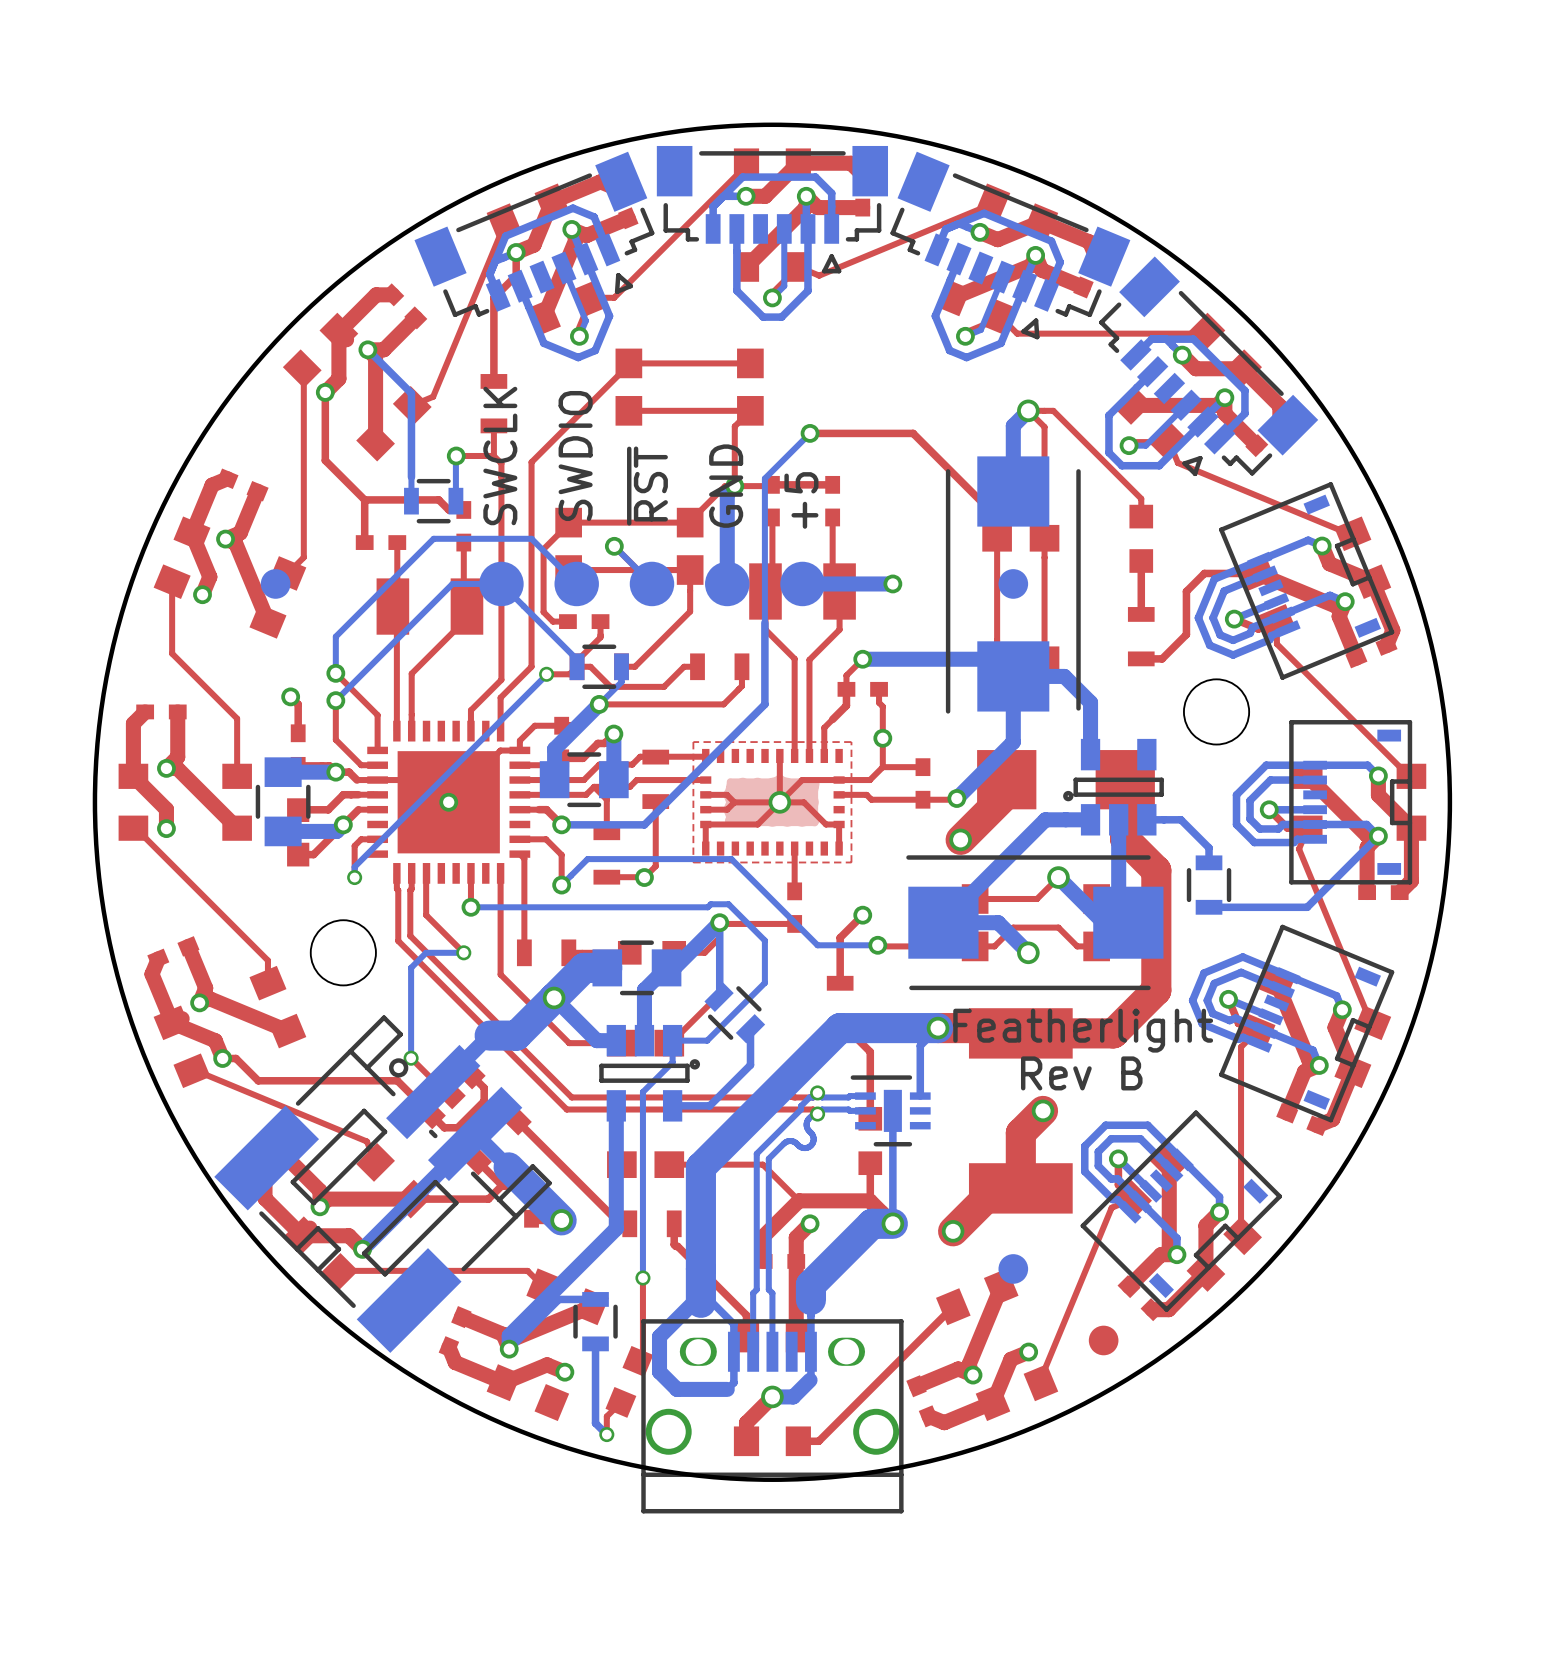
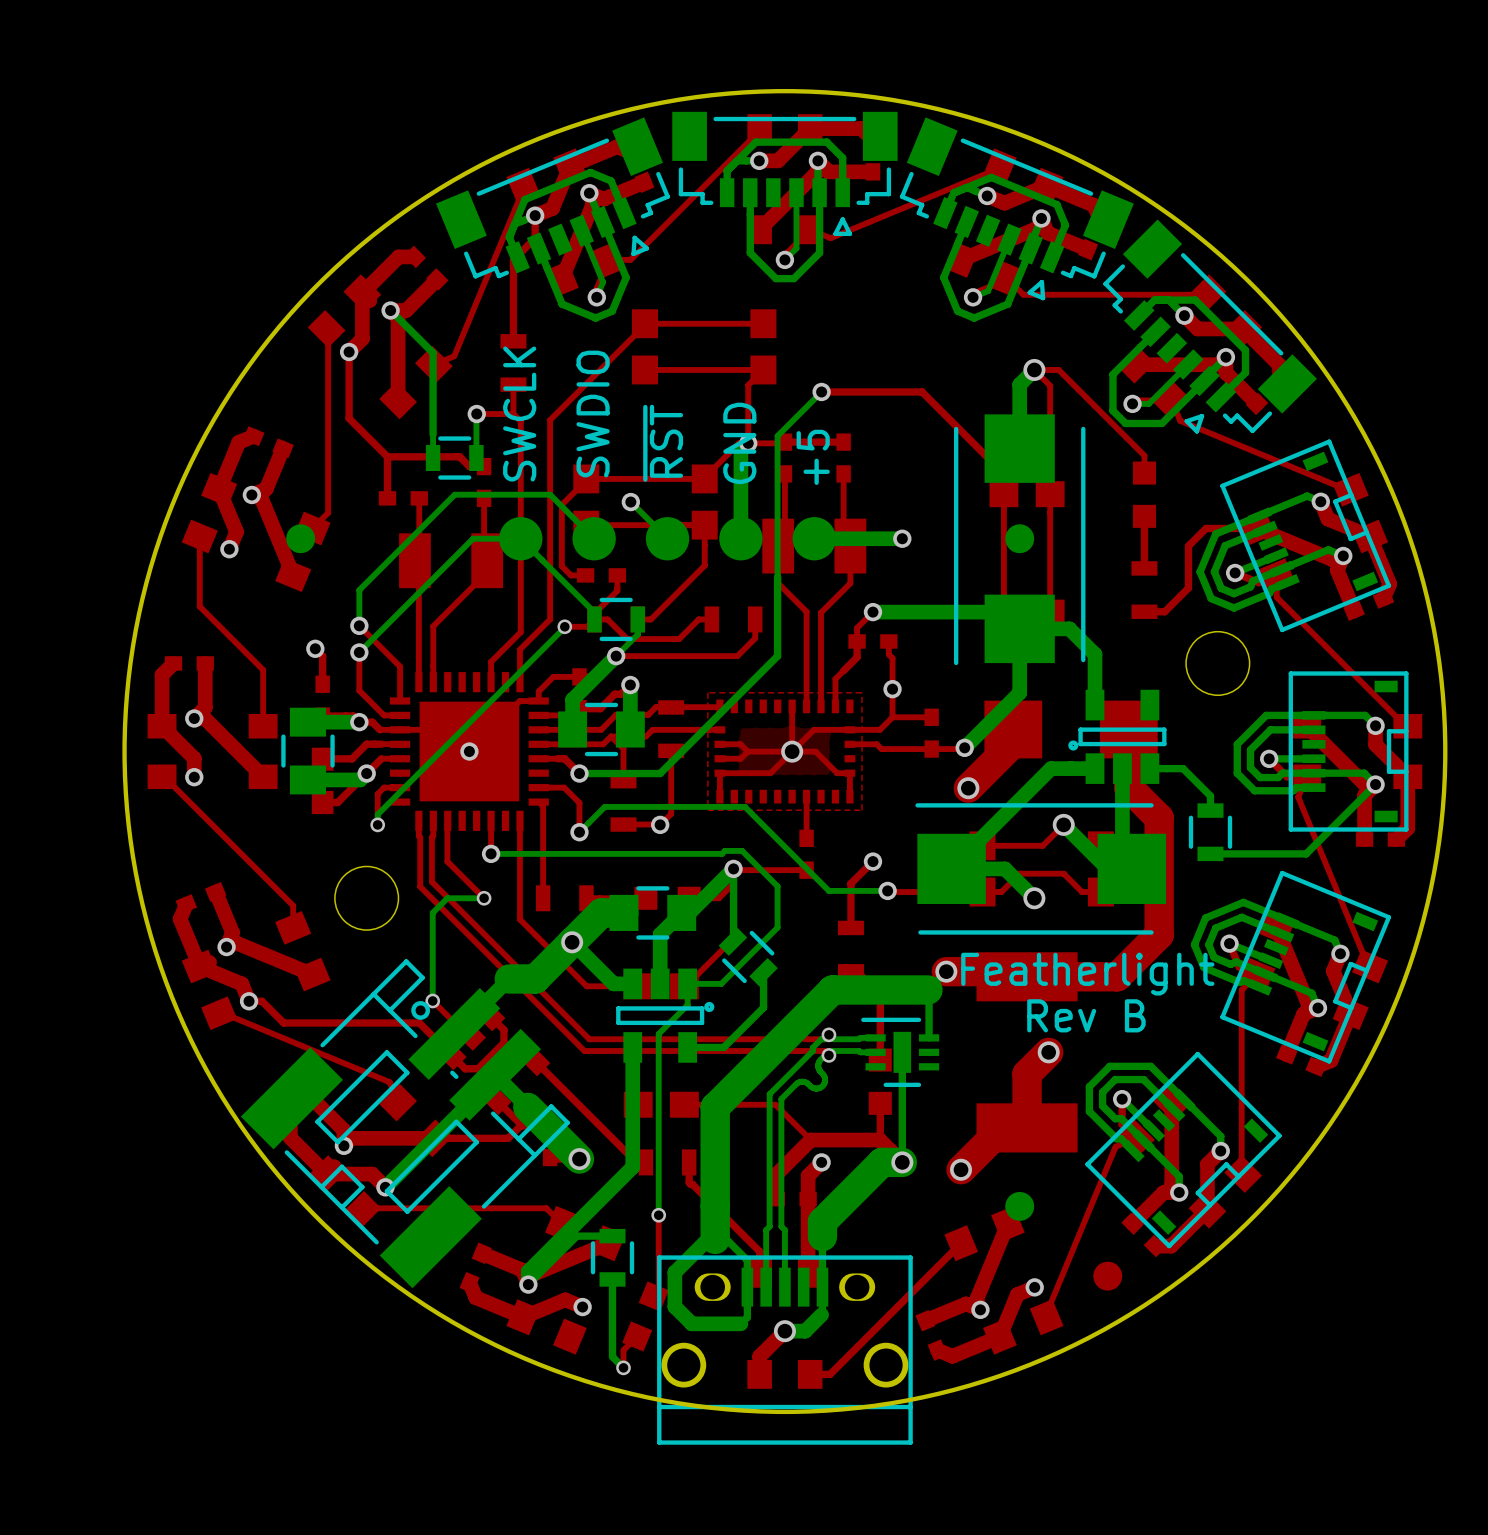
bottom track: (938, 1028) (840, 1028) (821, 1046) -> (929, 991) (832, 989)

